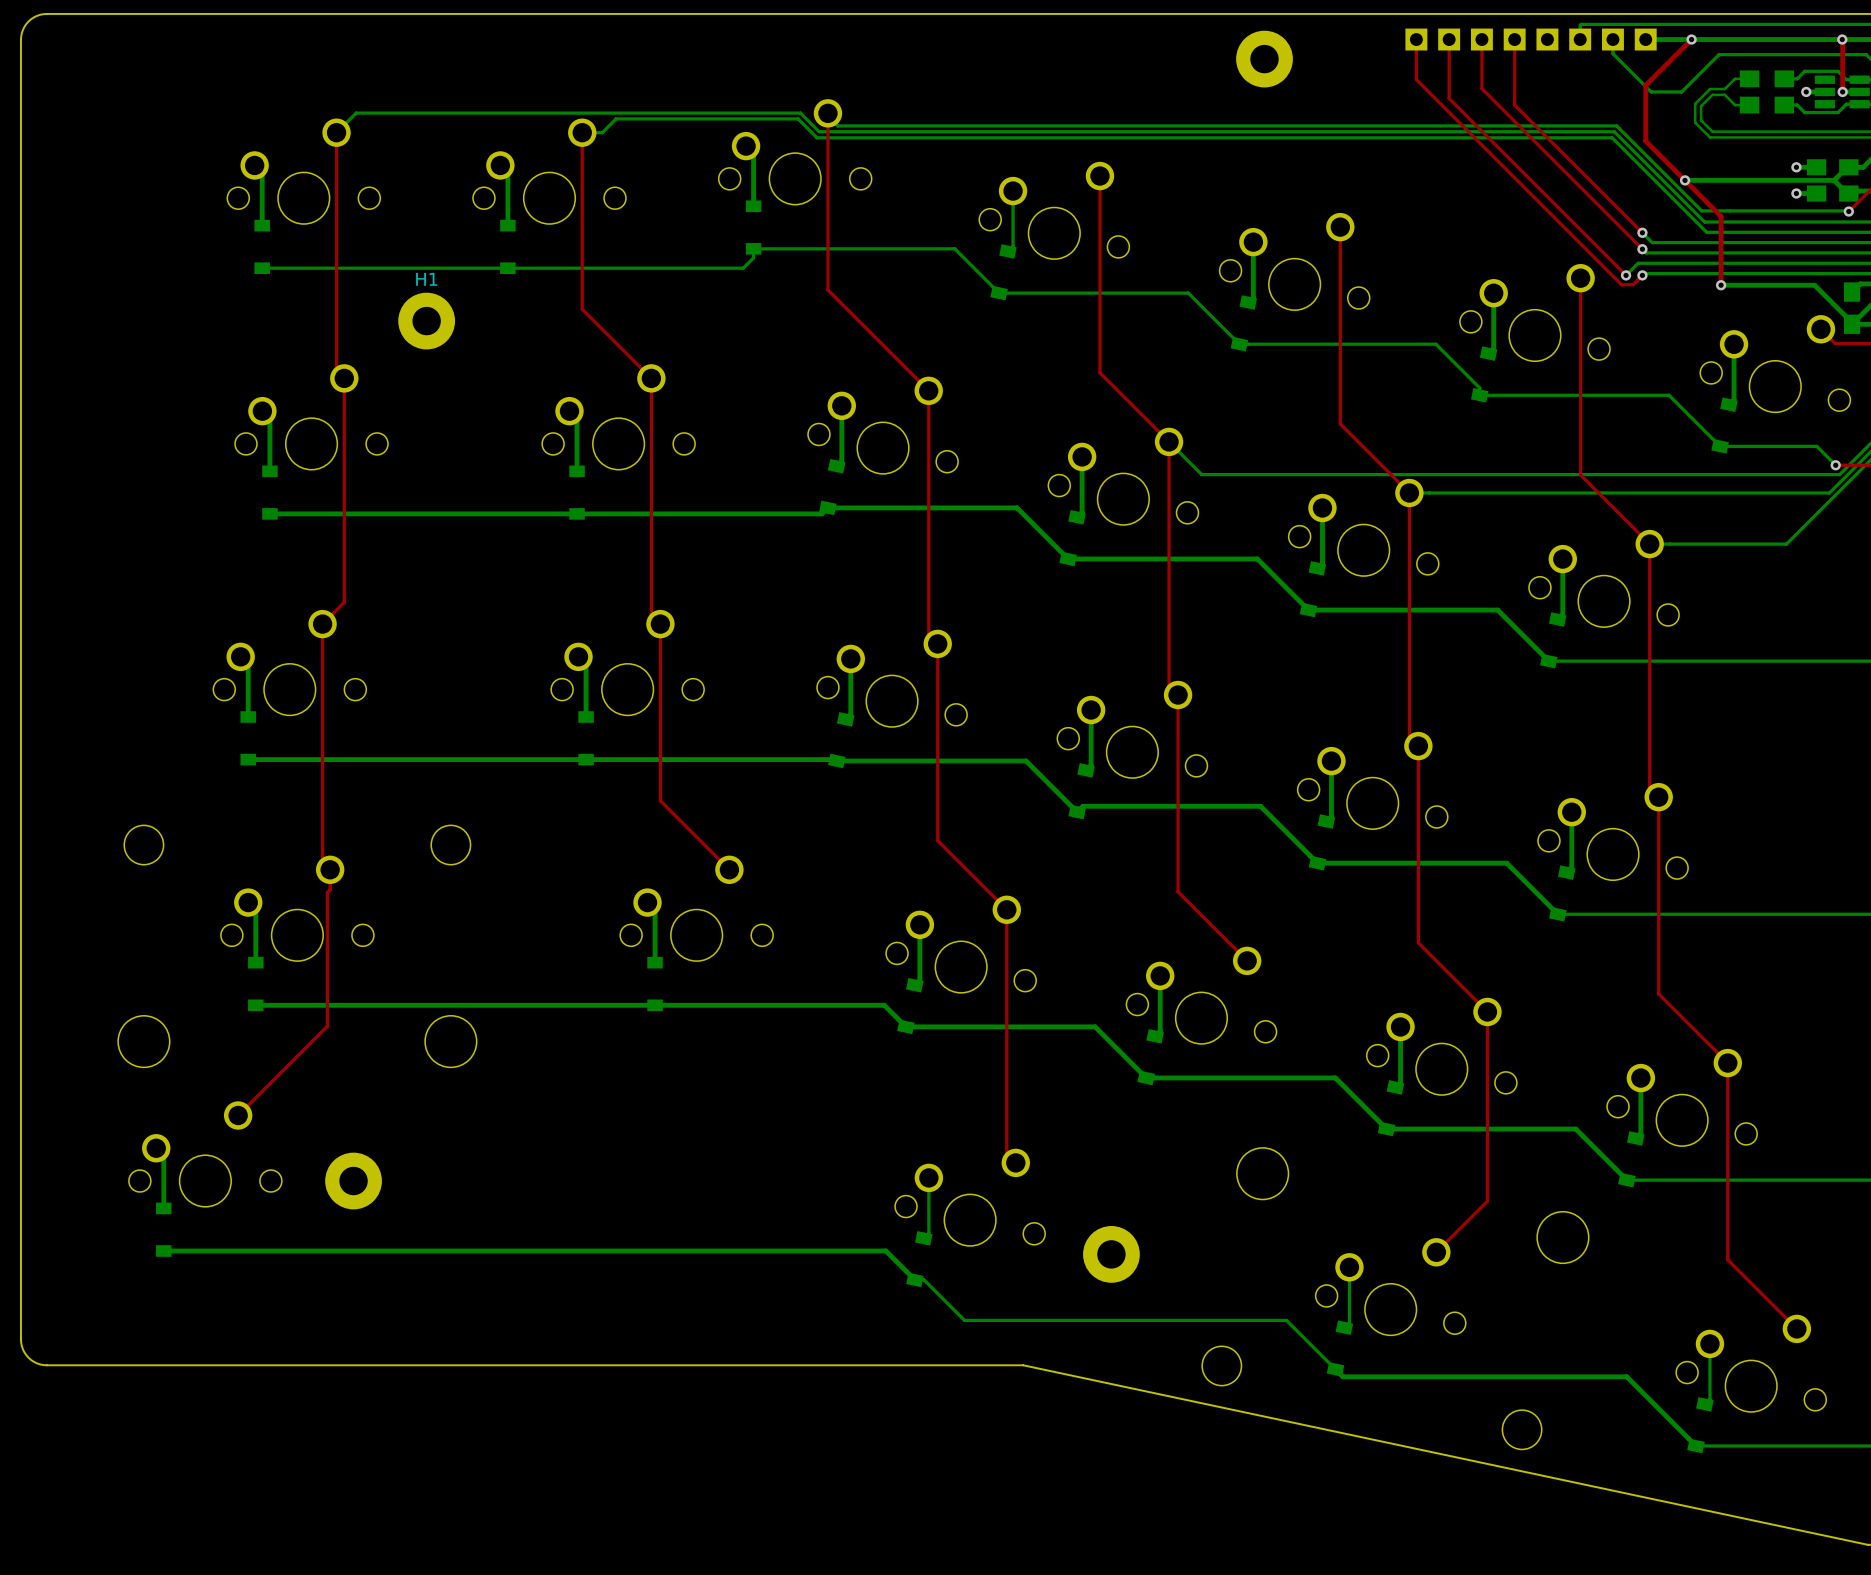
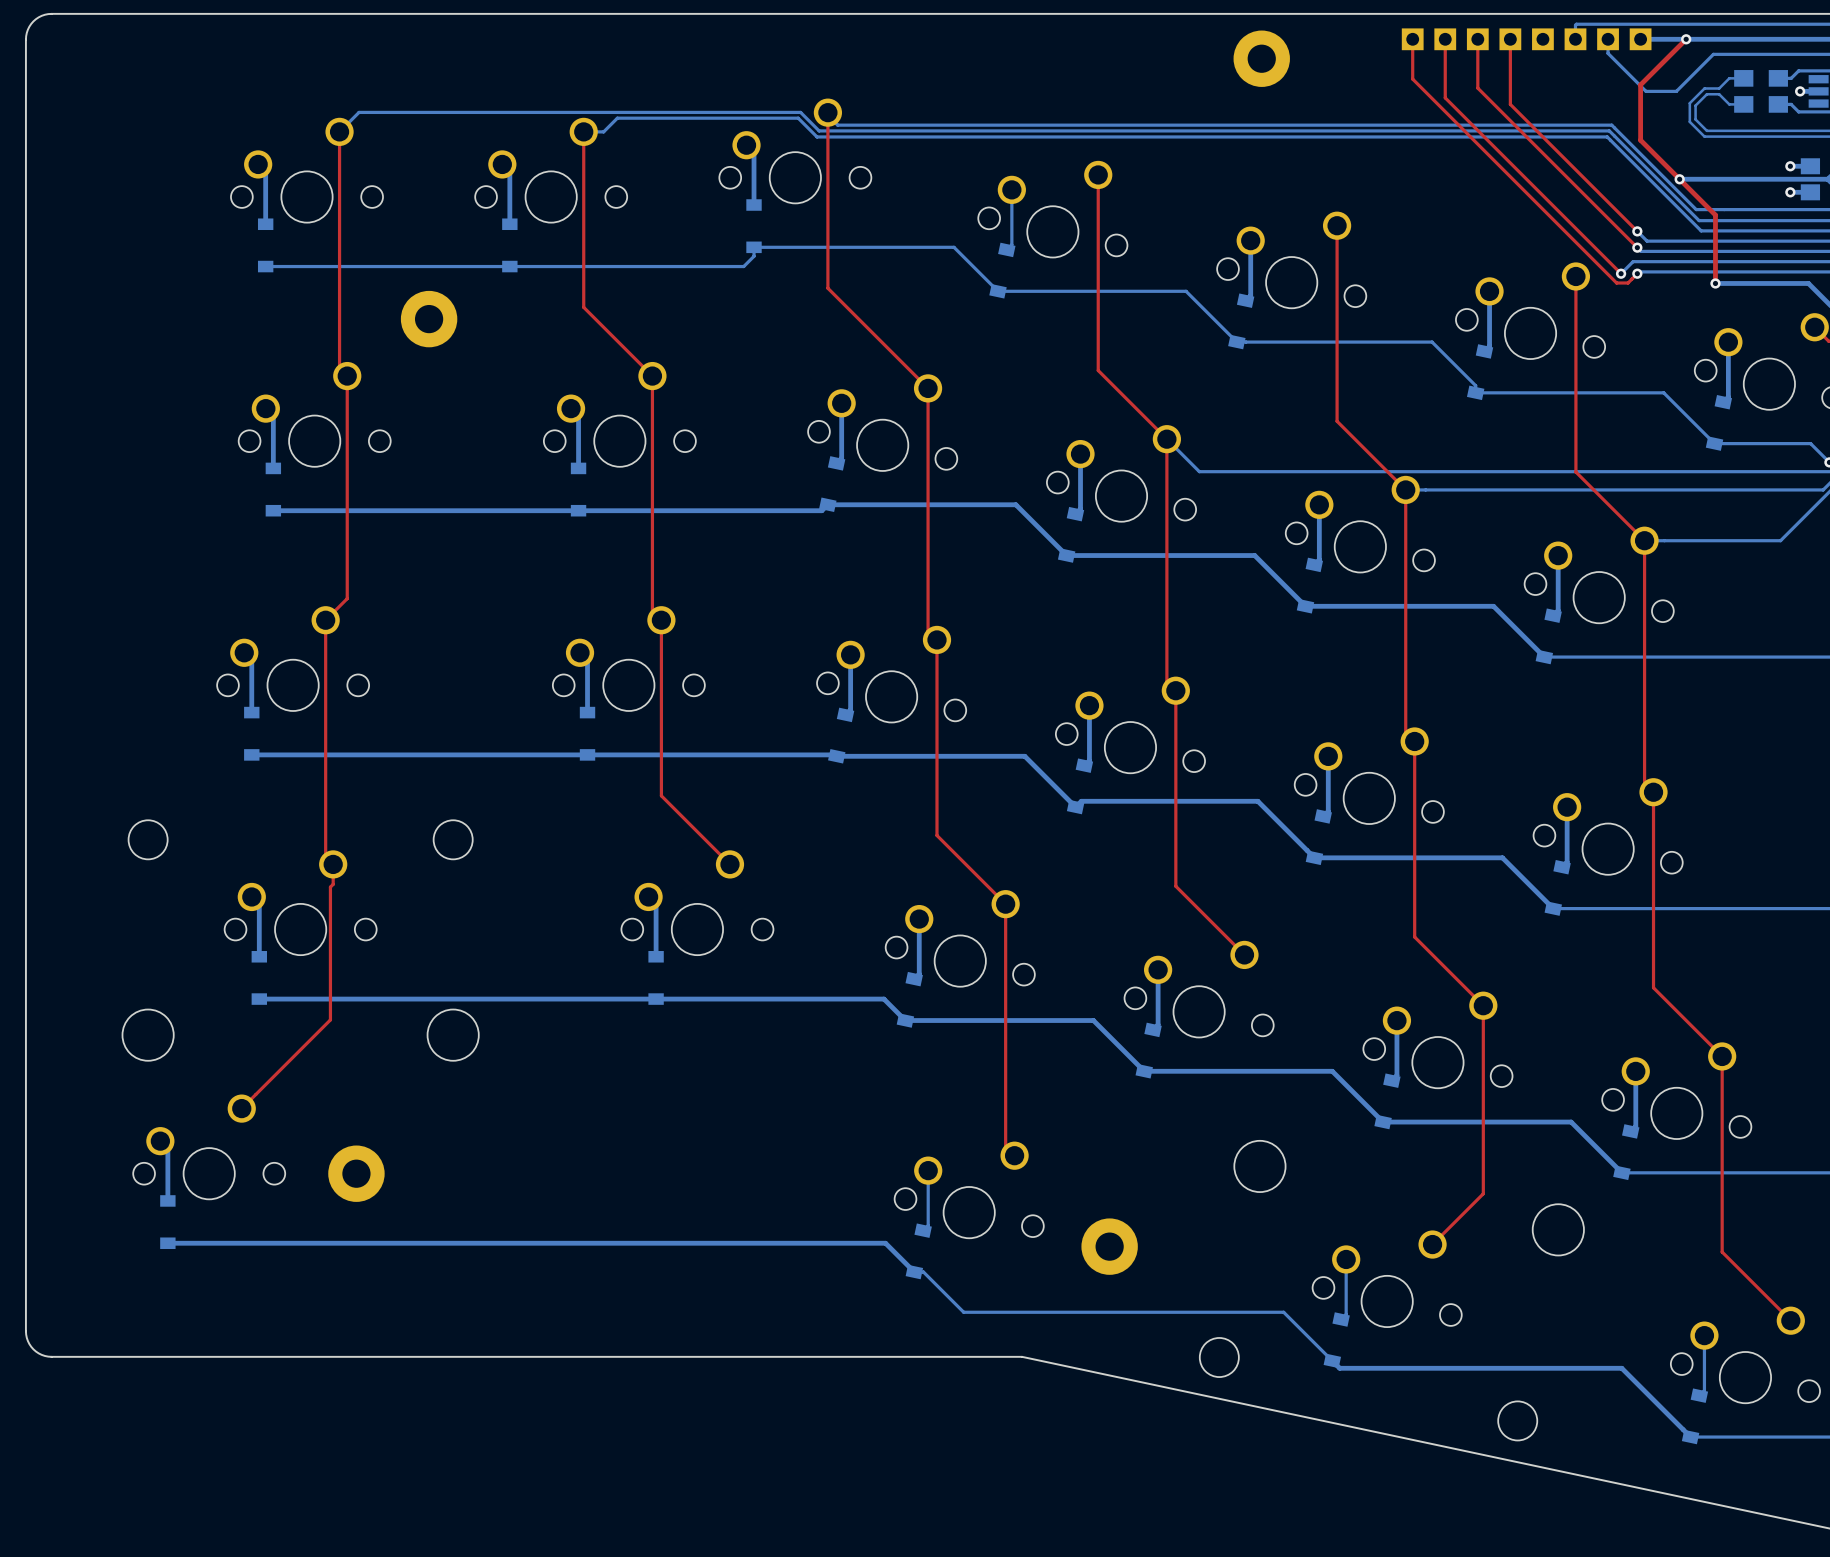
H1 name: H1 (426, 279) -> none

